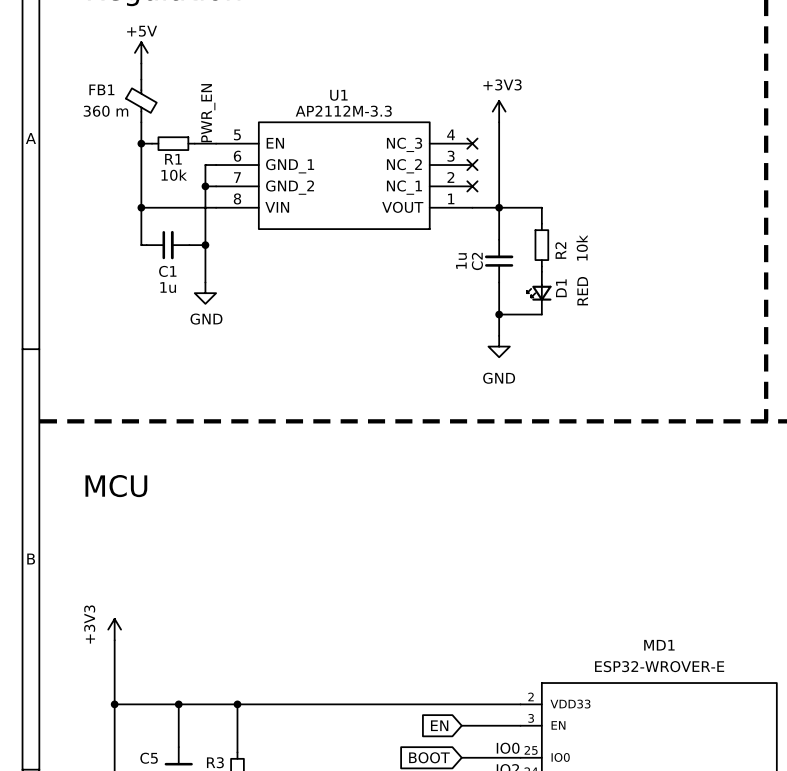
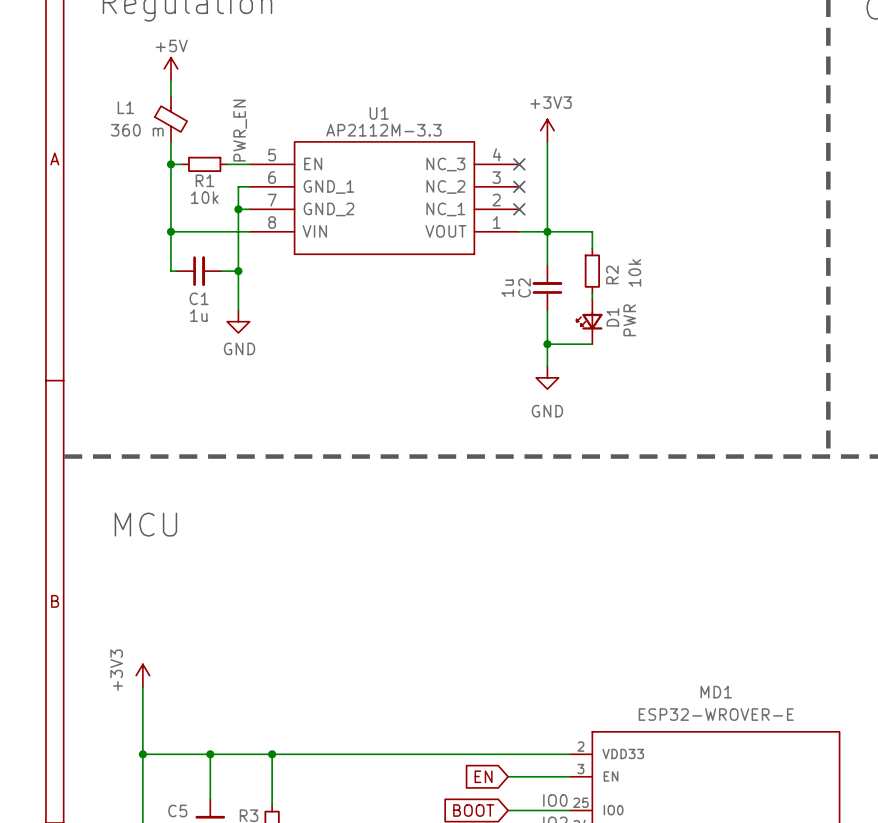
FB1 name: FB1 (101, 89) -> L1 (125, 107)
D1 value: RED (582, 291) -> PWR (629, 320)

